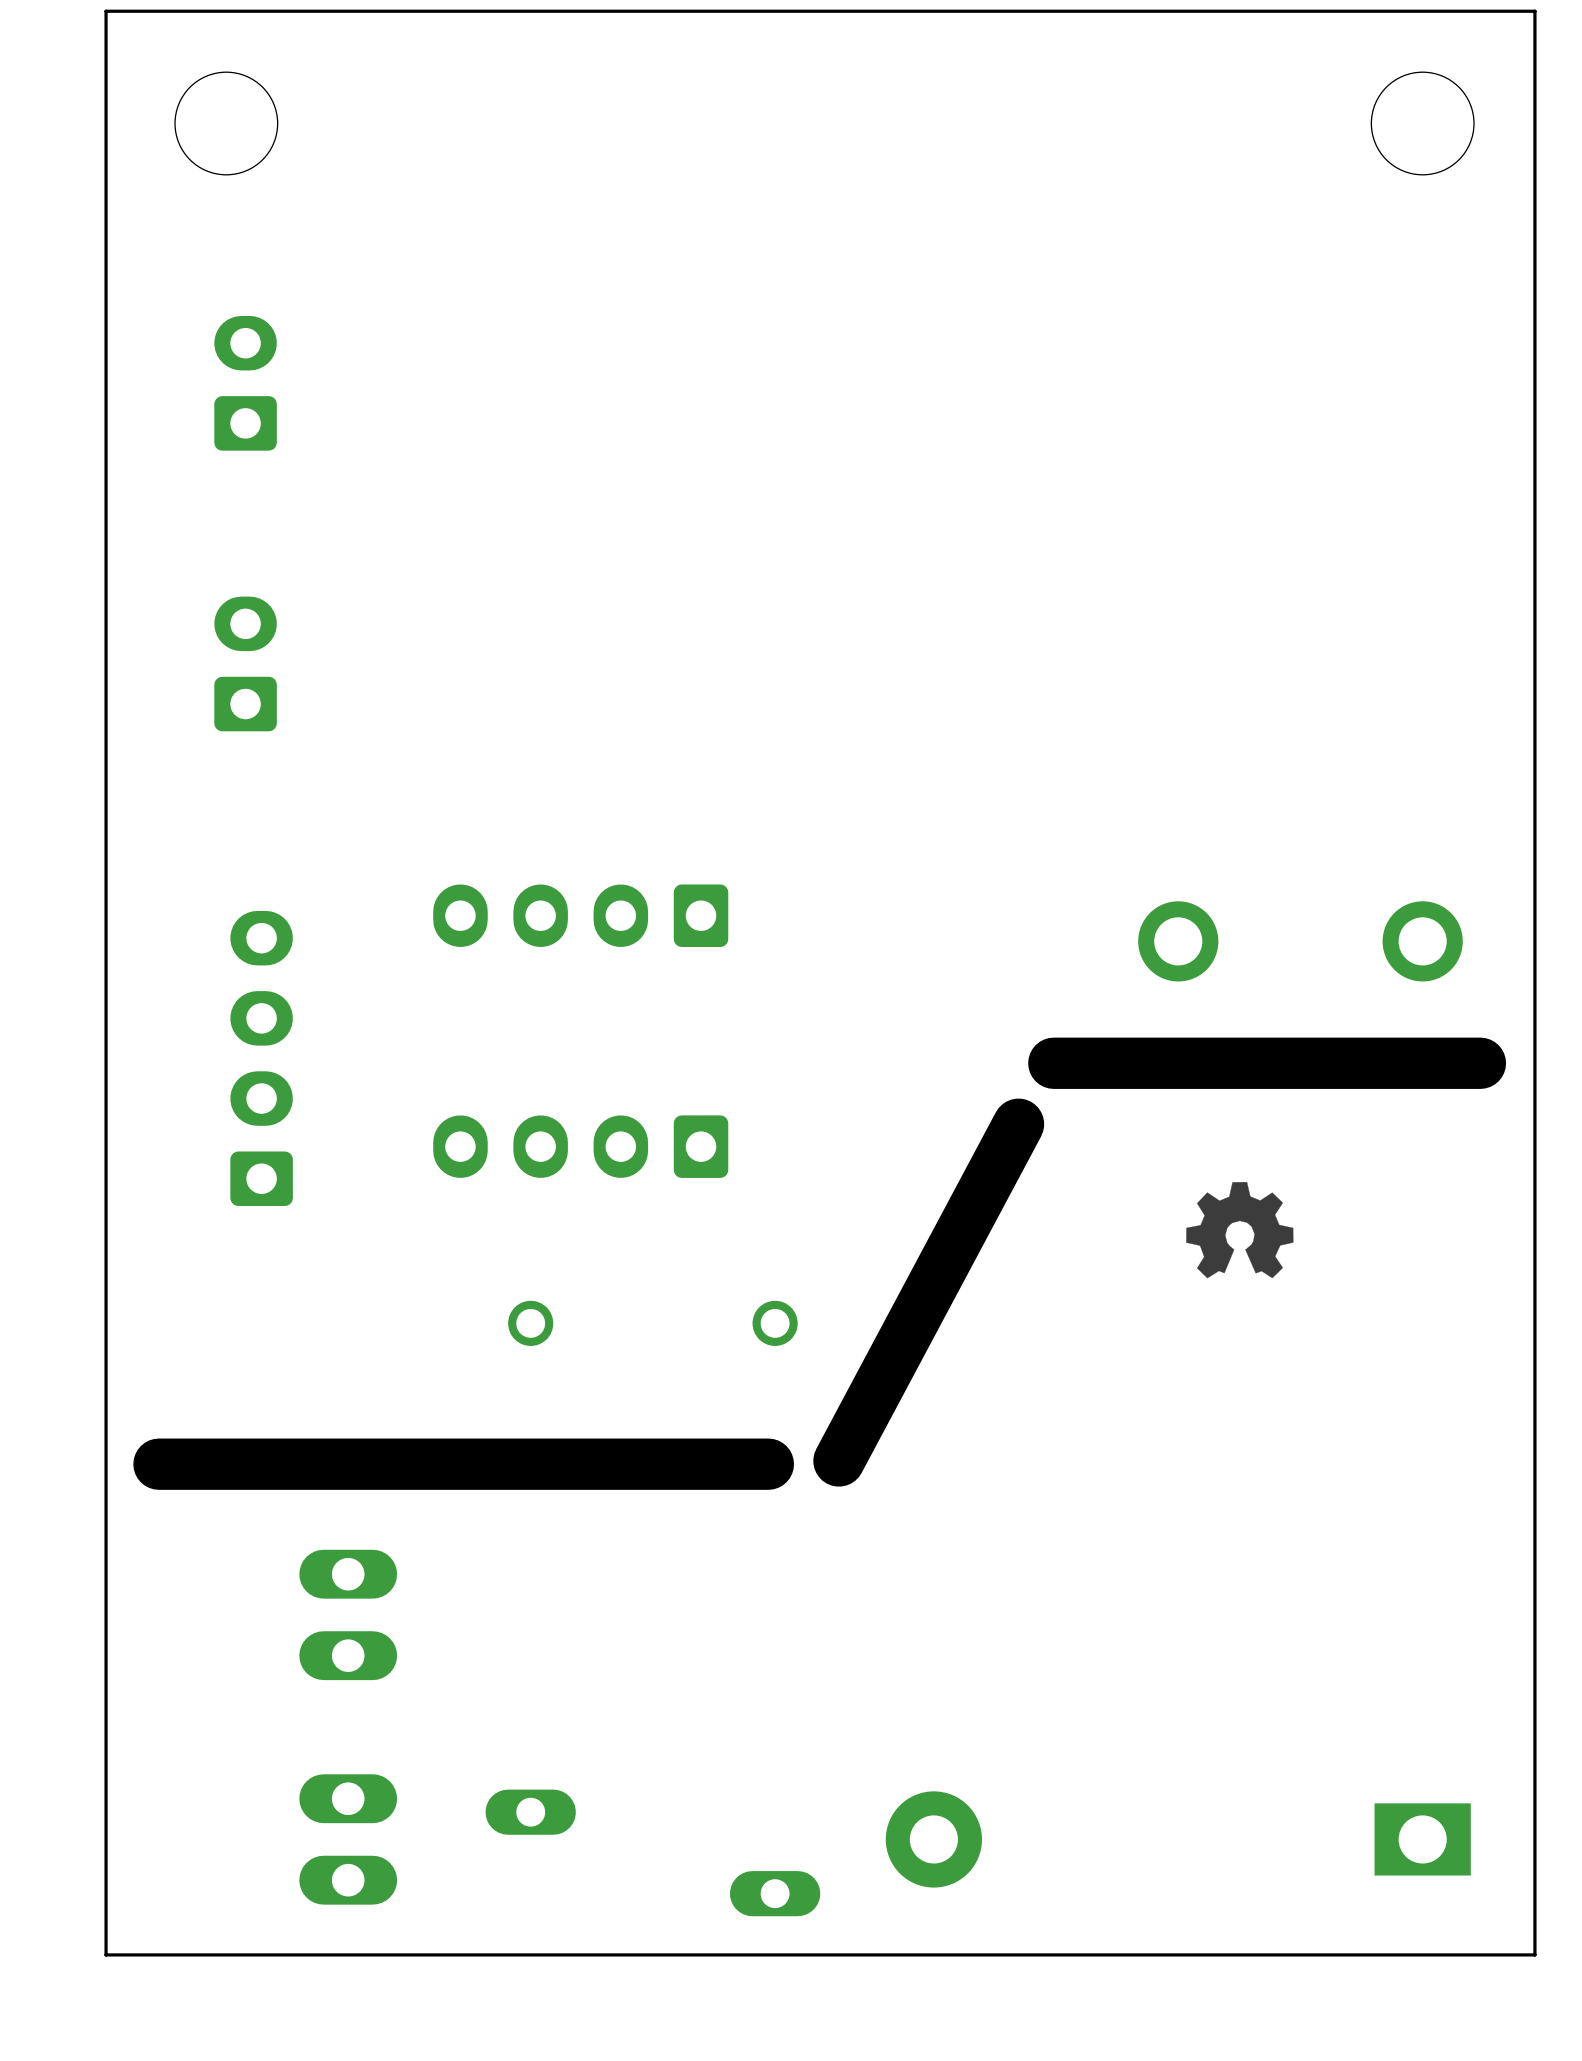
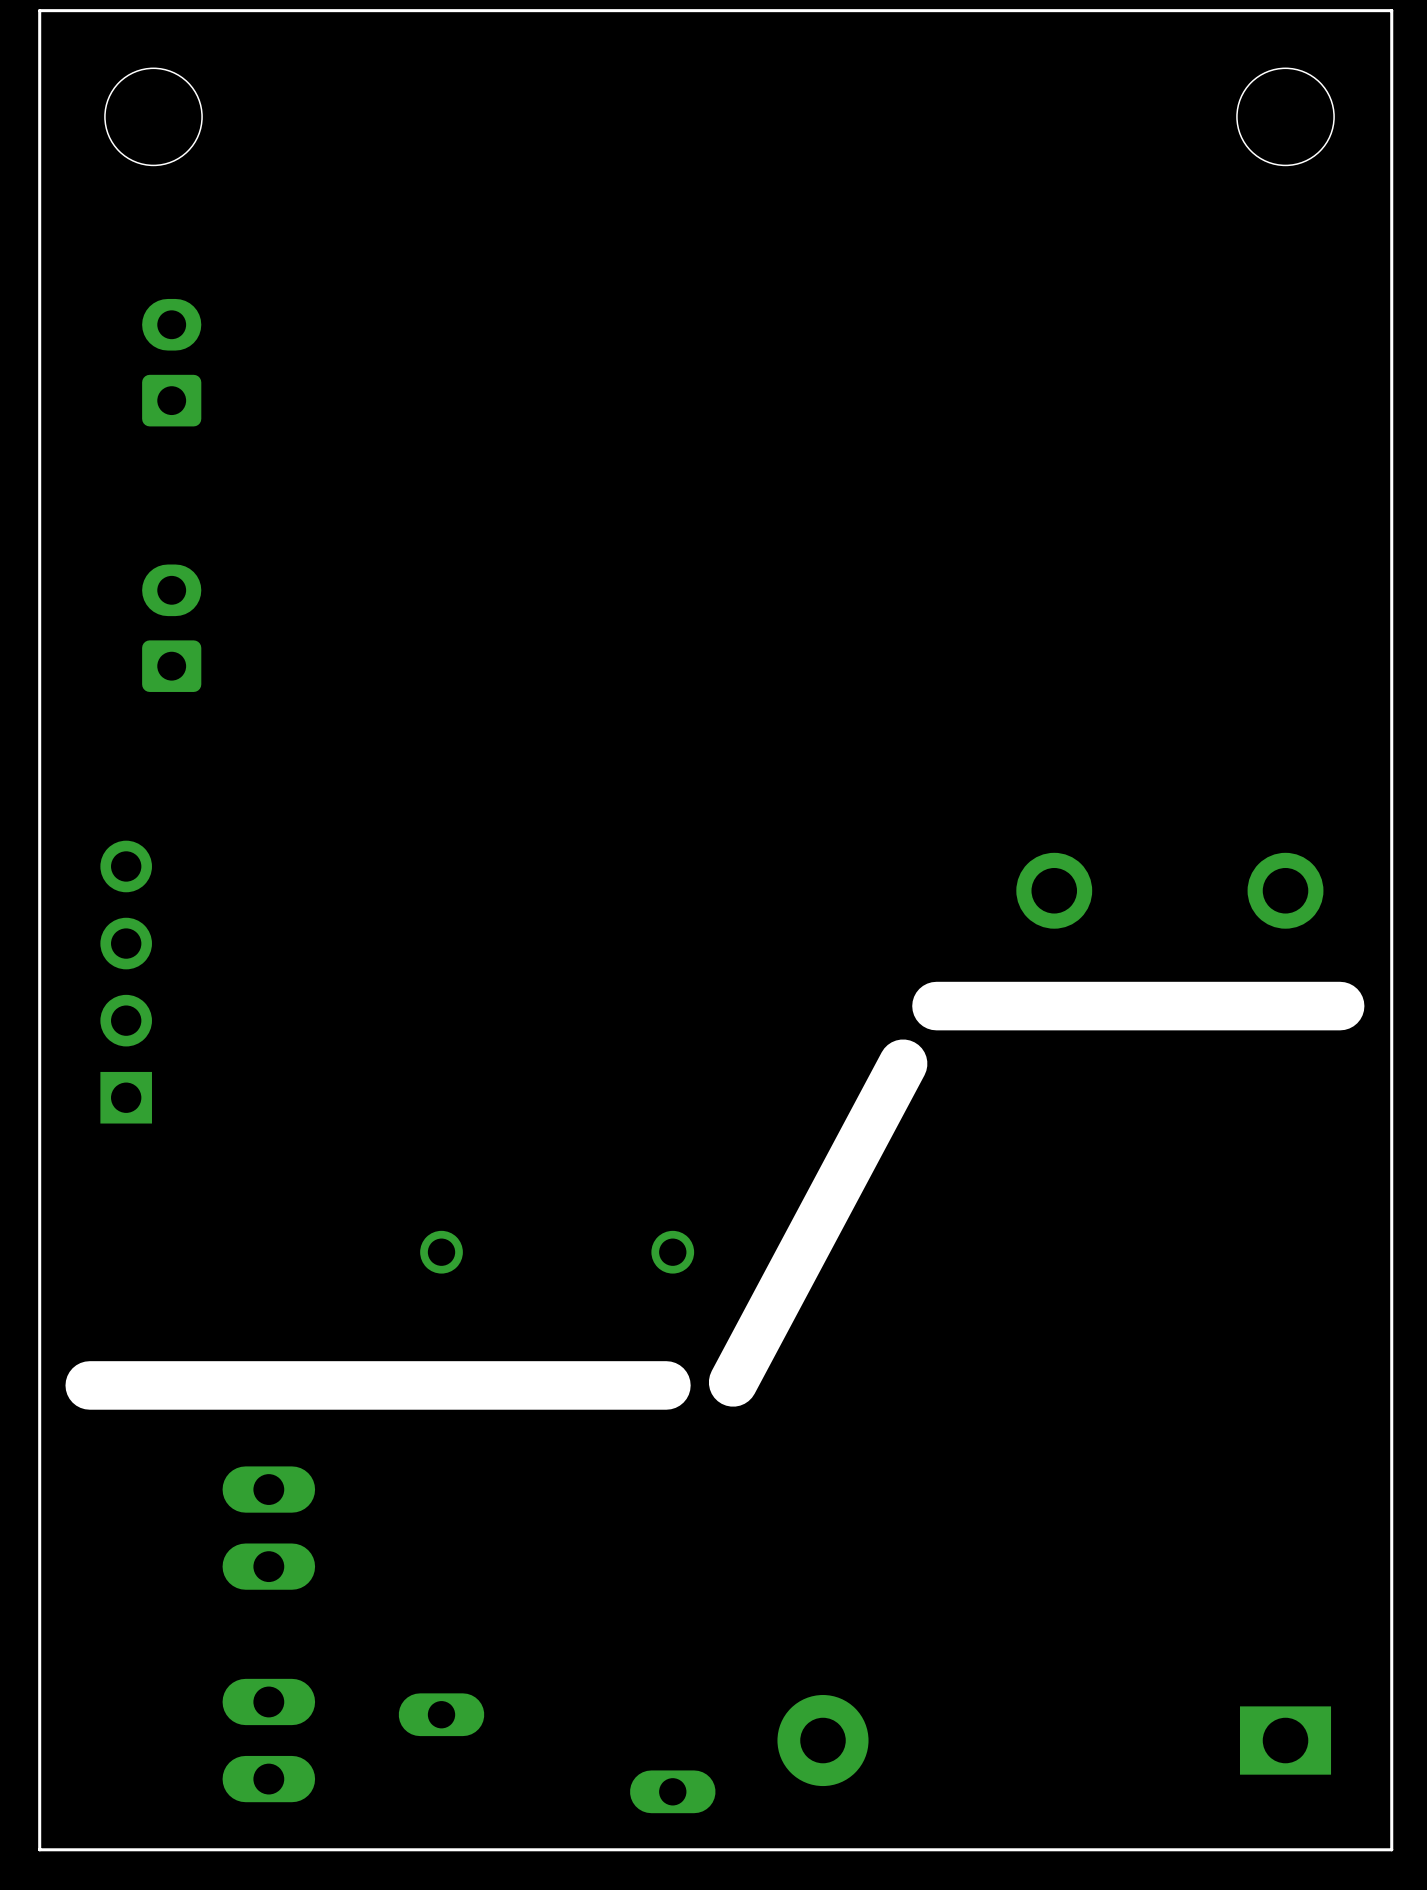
part: (580, 915) -> none
part: none -> (126, 982)
part: (261, 1058) -> none
part: (580, 1146) -> none
drawing: [1186, 1181, 1294, 1279] -> none

